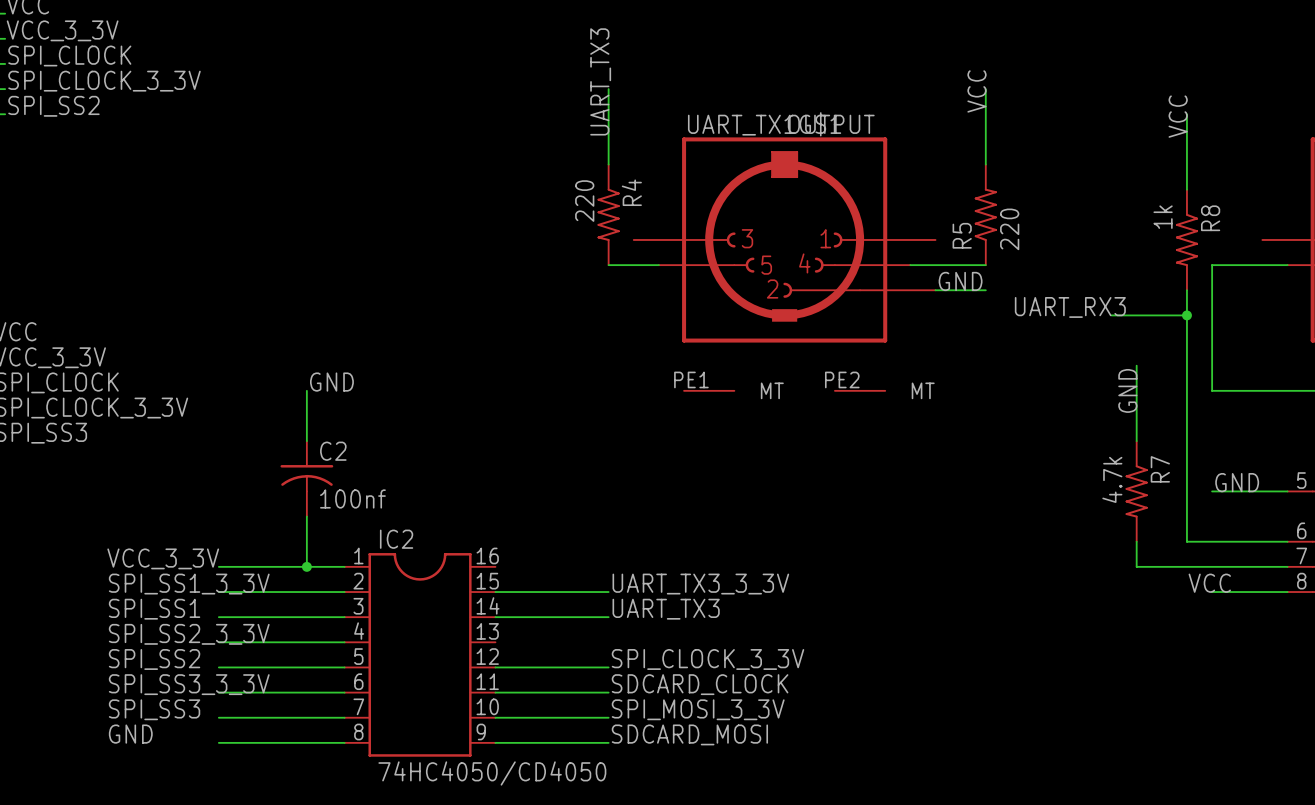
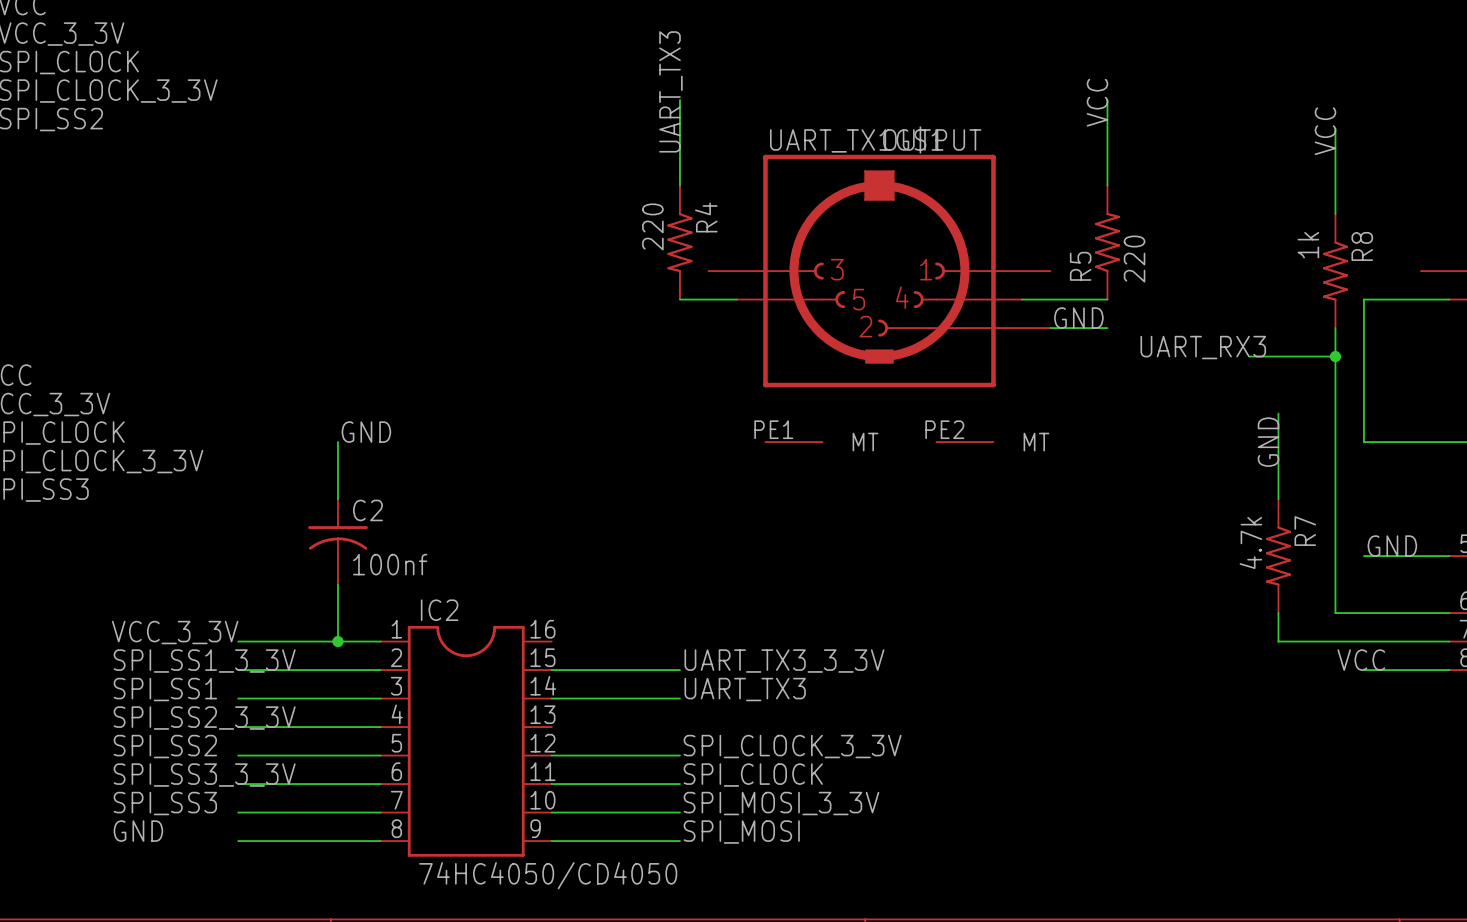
label: SDCARD_CLOCK (700, 684) -> SPI_CLOCK (753, 775)
label: SDCARD_MOSI (689, 734) -> SPI_MOSI (741, 832)

